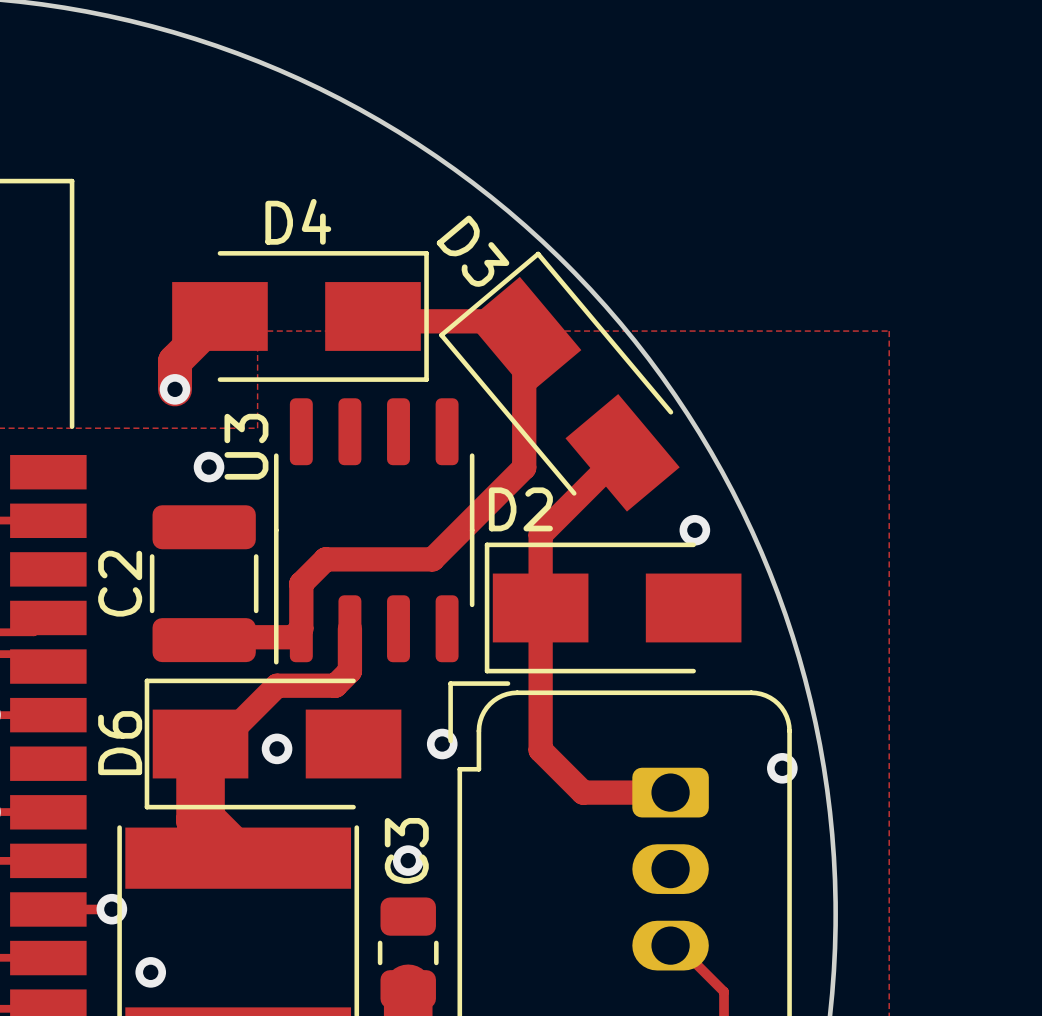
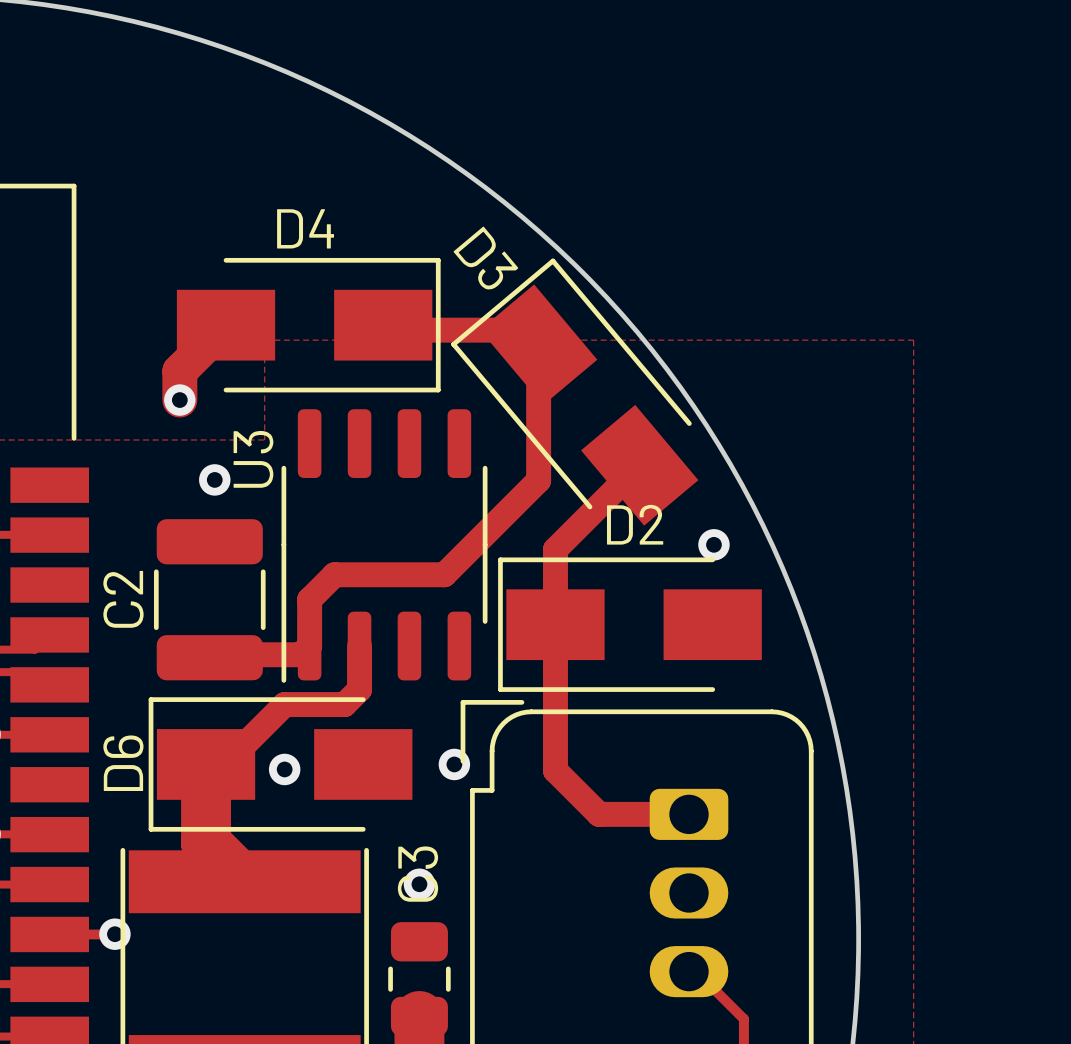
D2 name position: D2 (520, 509) -> D2 (635, 524)
via: (782, 768) -> none
via: (150, 972) -> none

